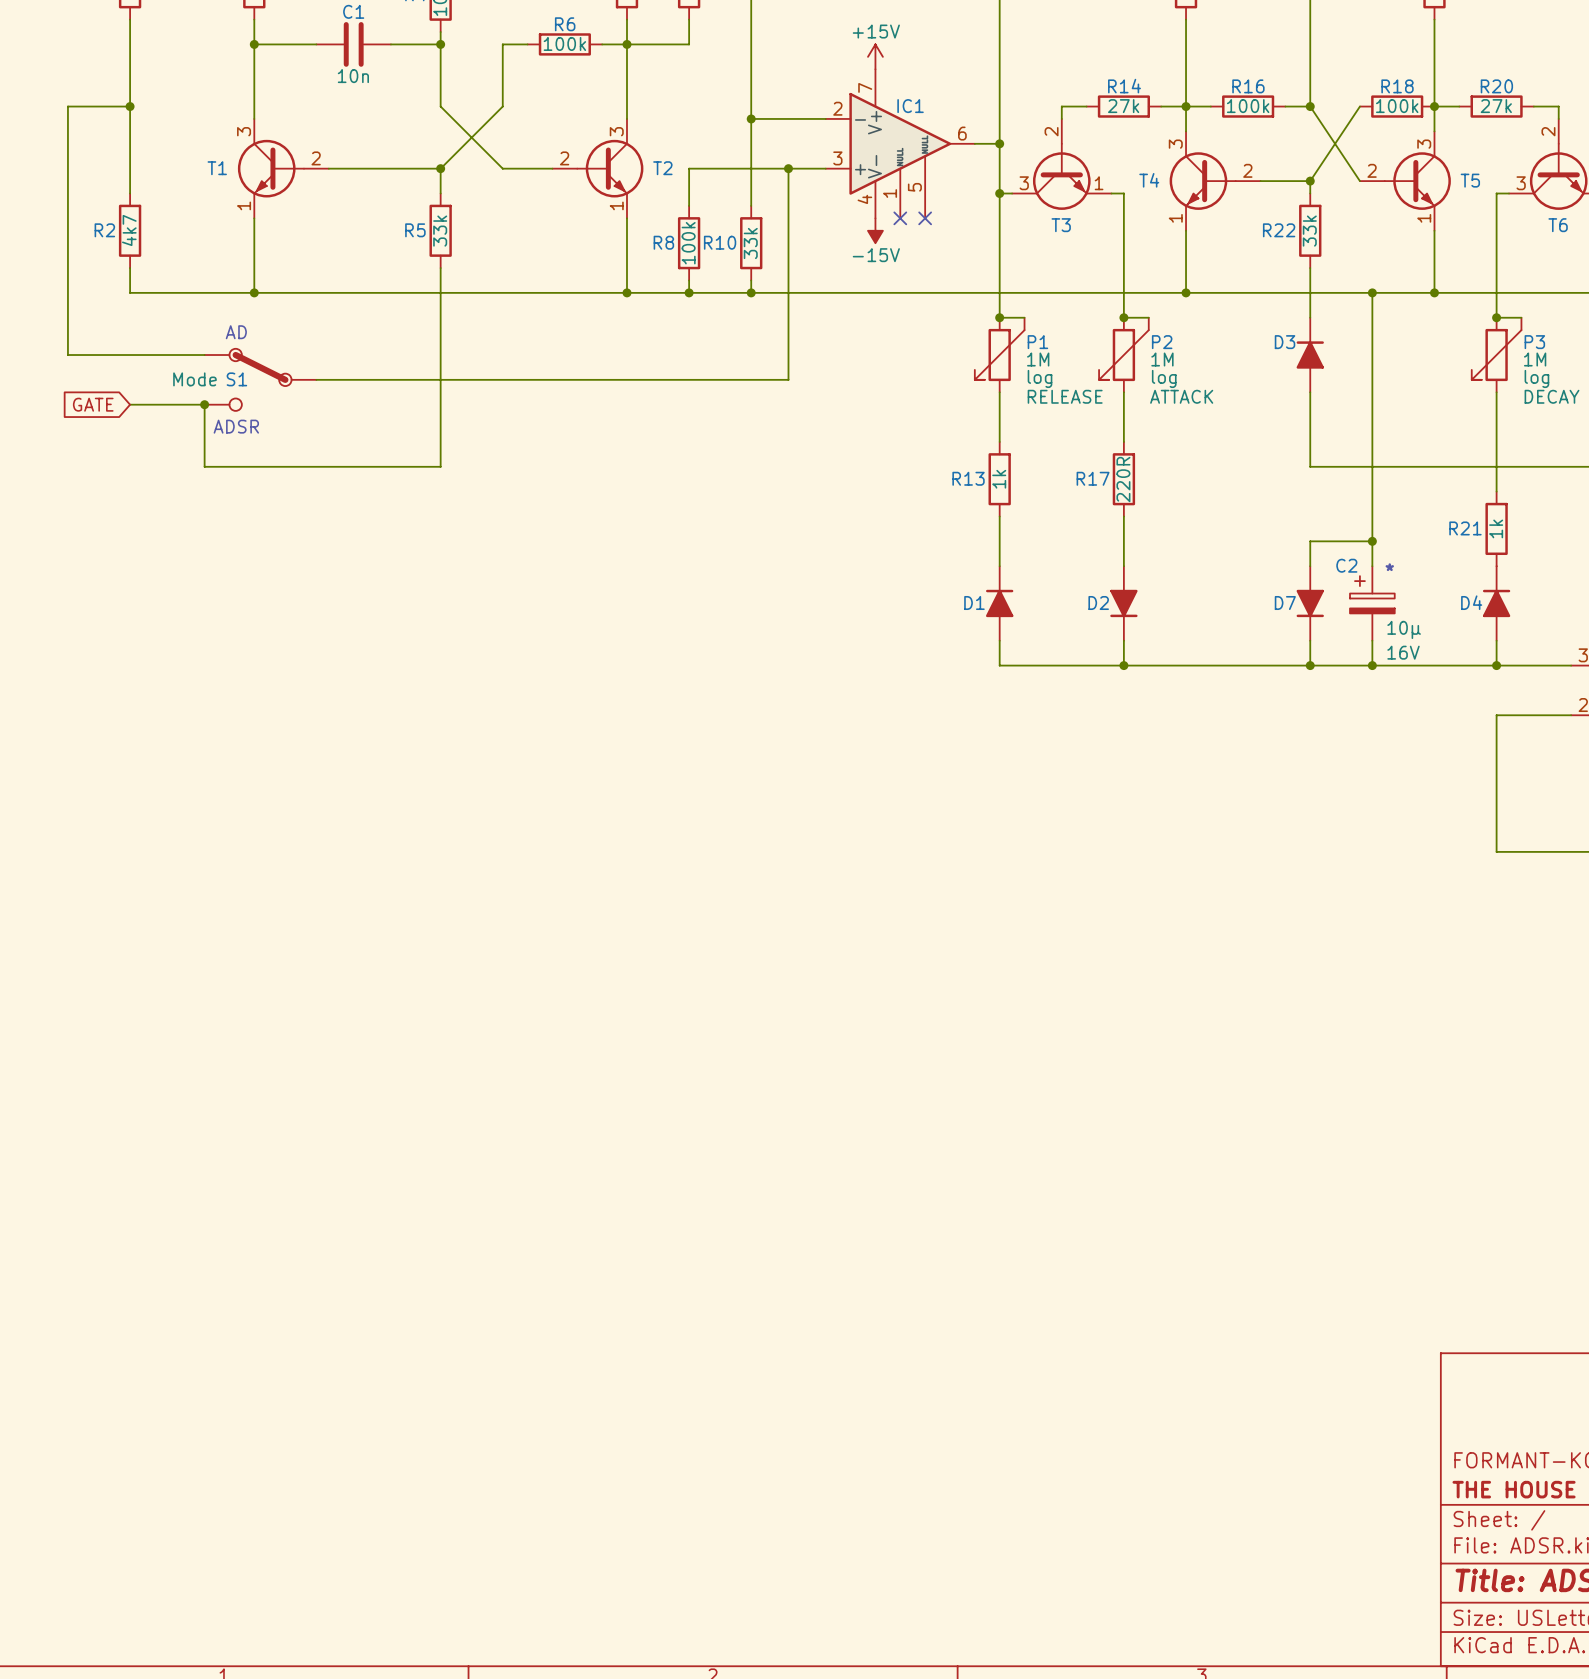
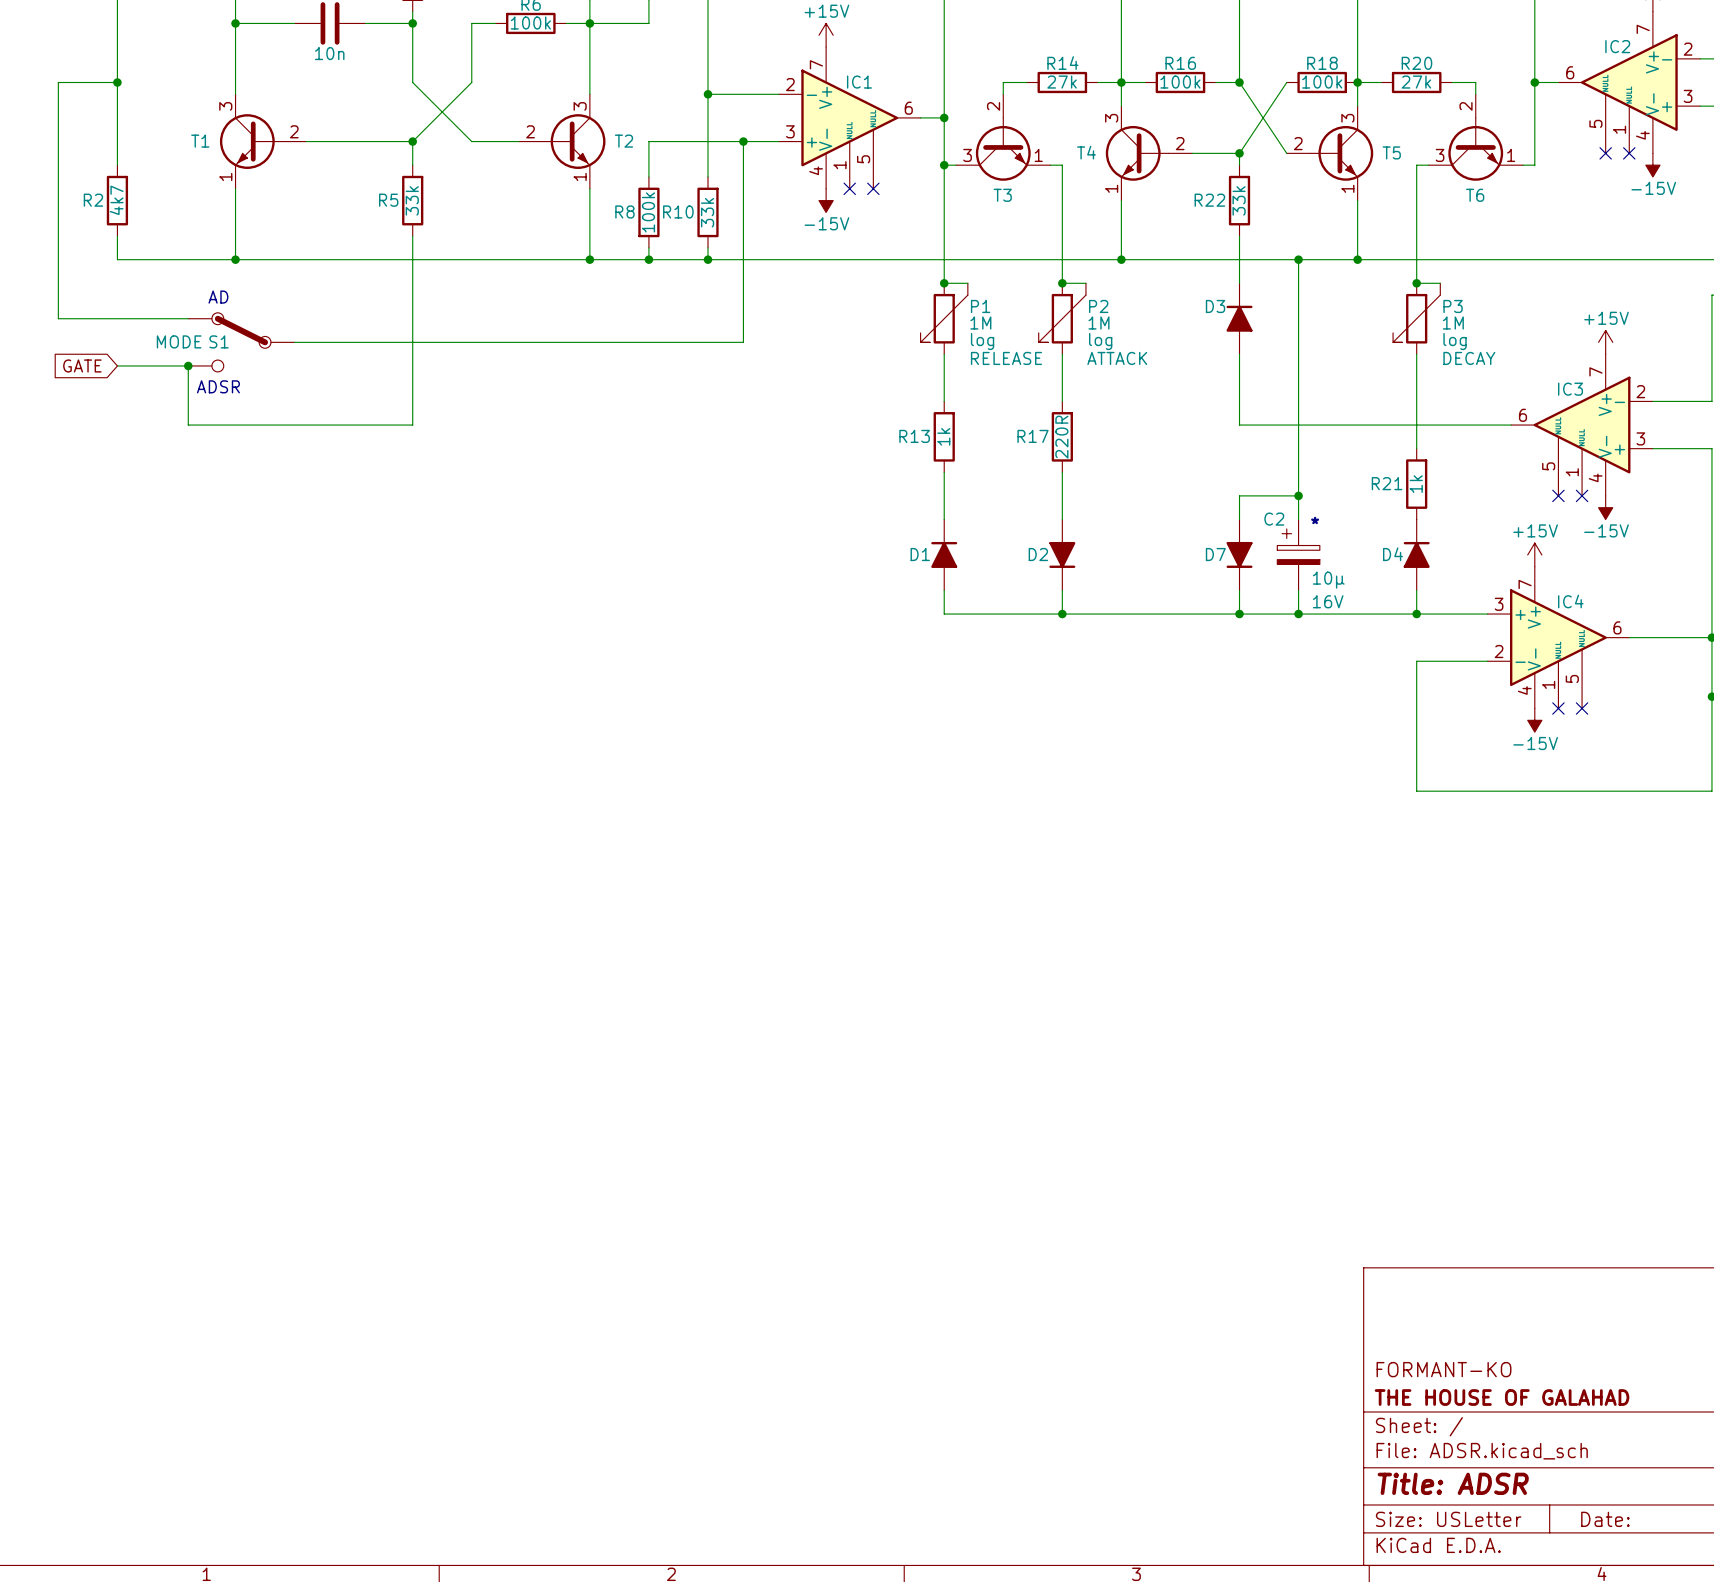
S1 value: Mode (194, 379) -> MODE (179, 341)

